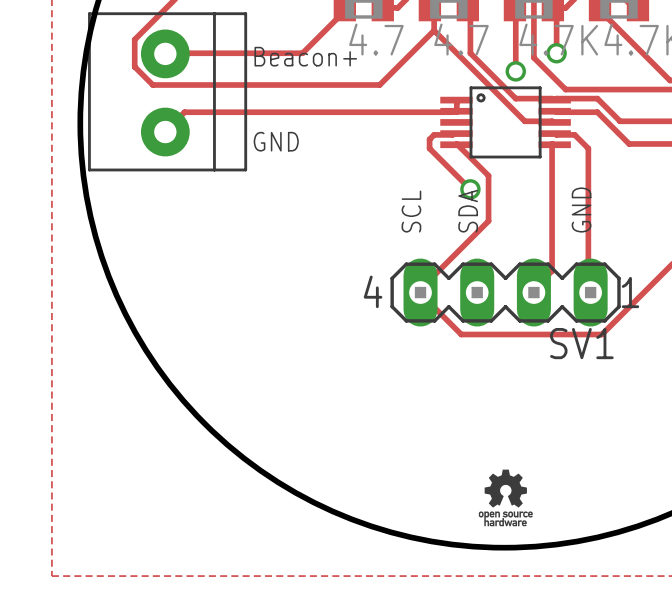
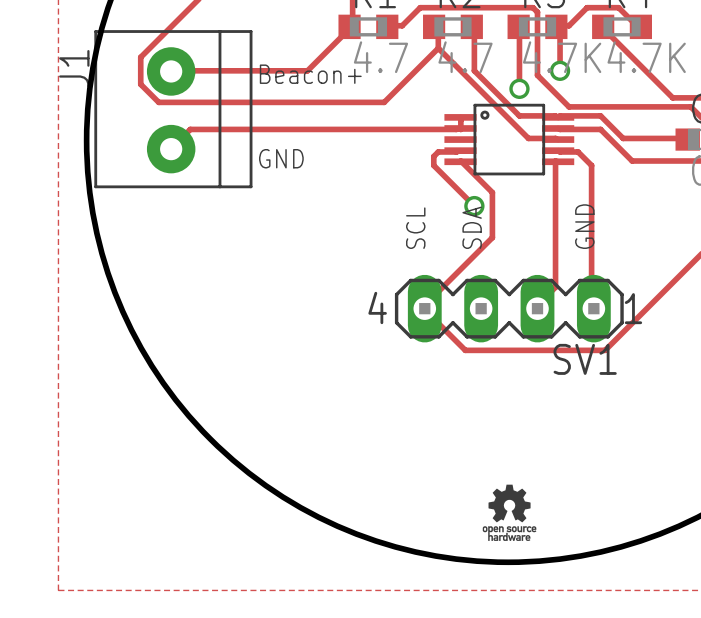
J1 name: none -> J1 (74, 68)

